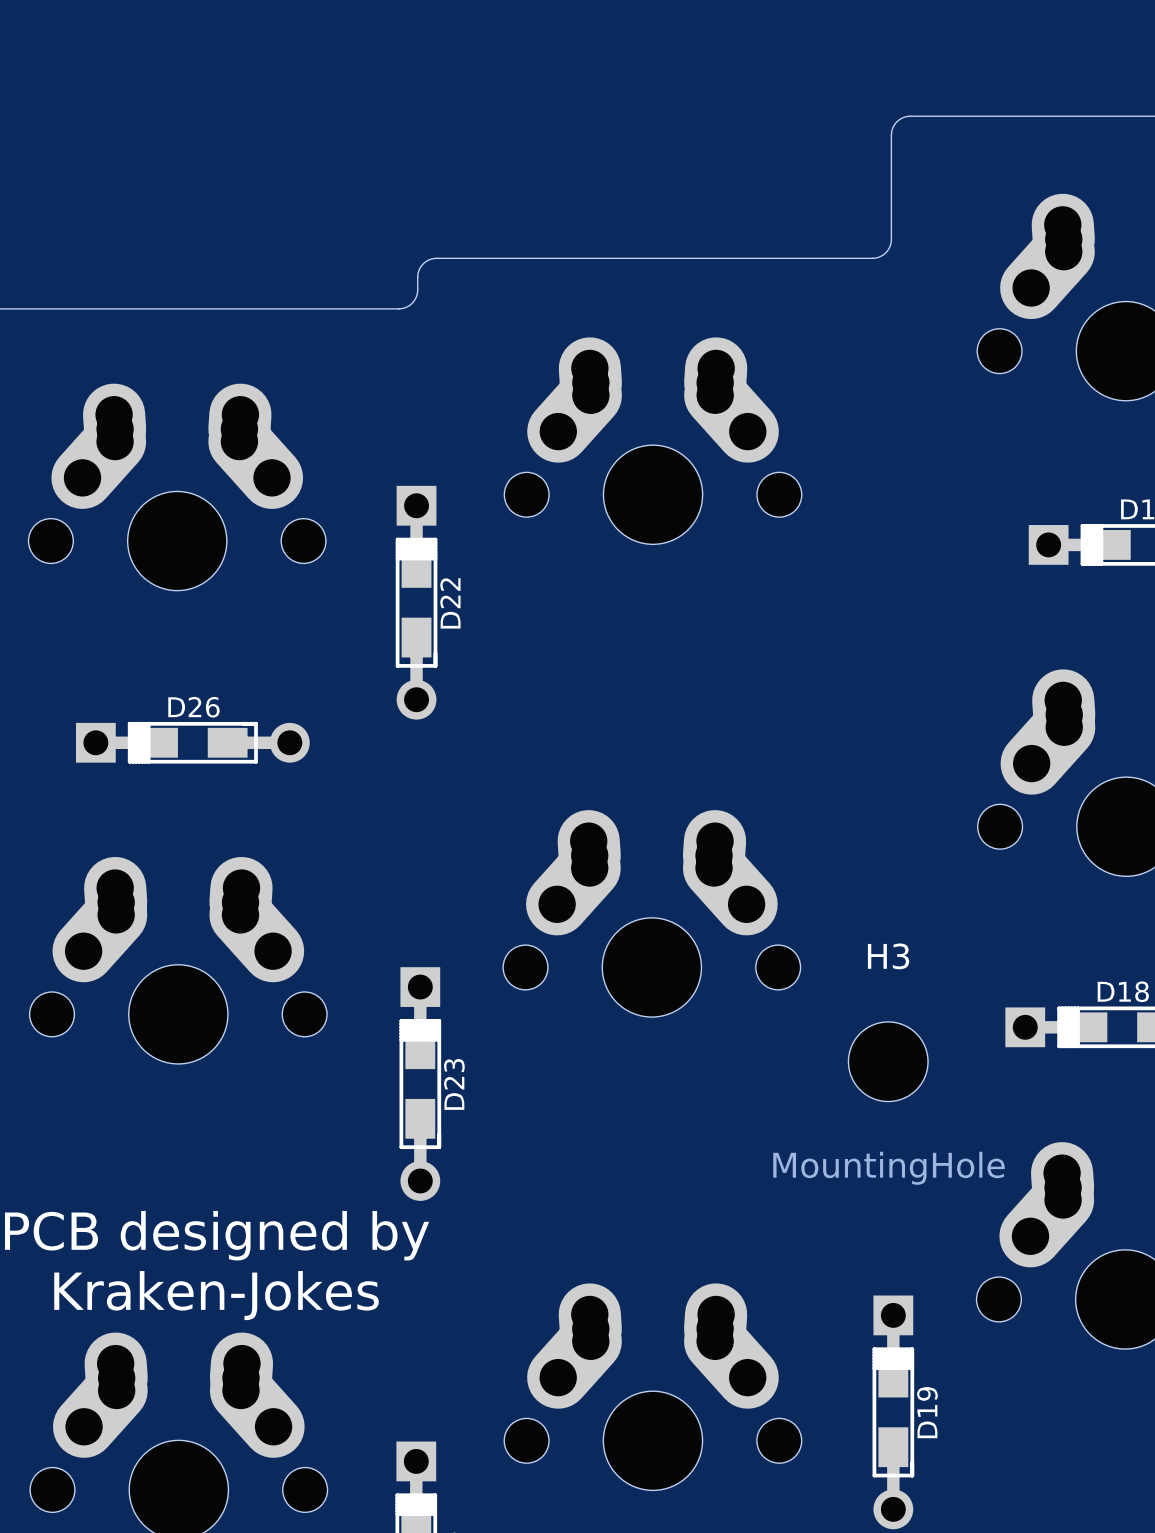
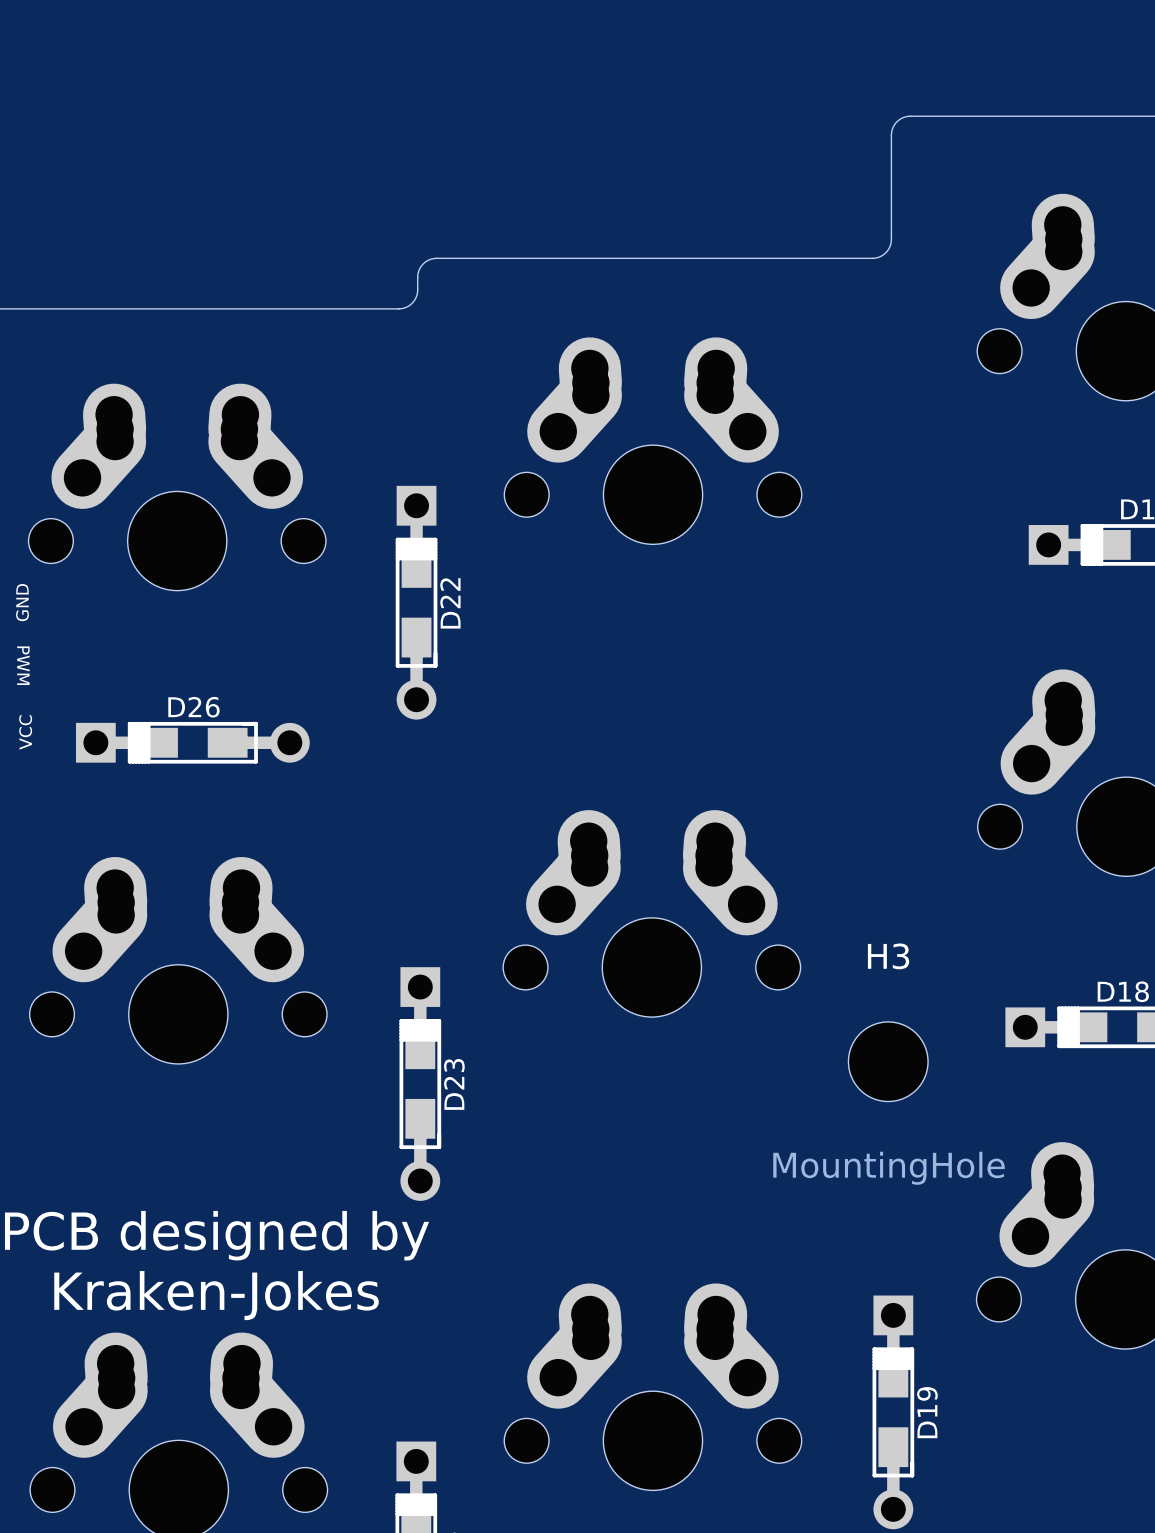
text: none -> GND (22, 602)
text: none -> PWM (23, 665)
text: none -> VCC (25, 732)

